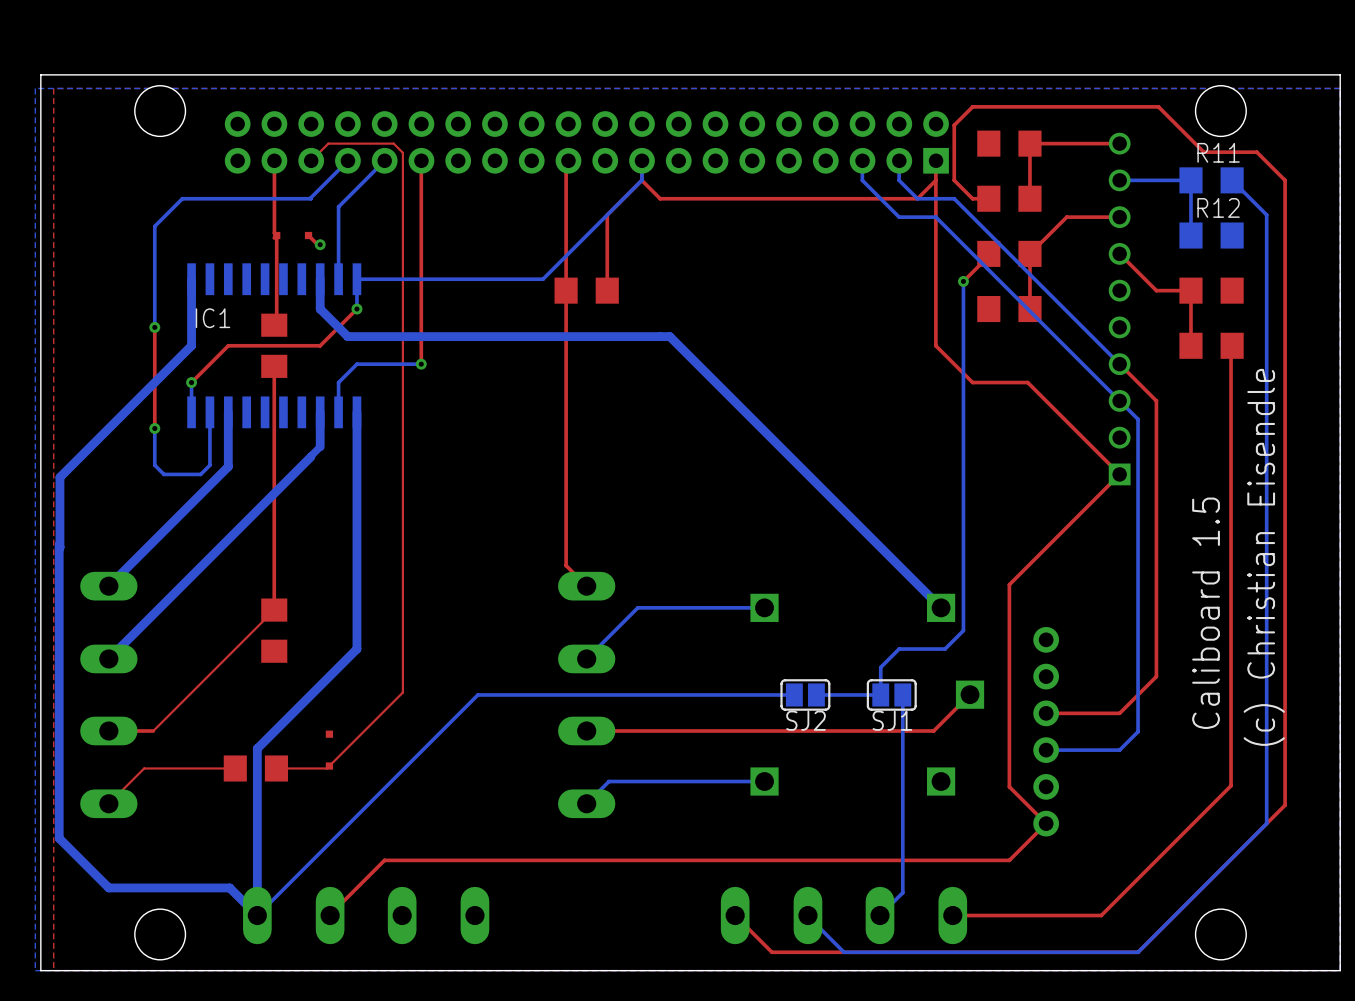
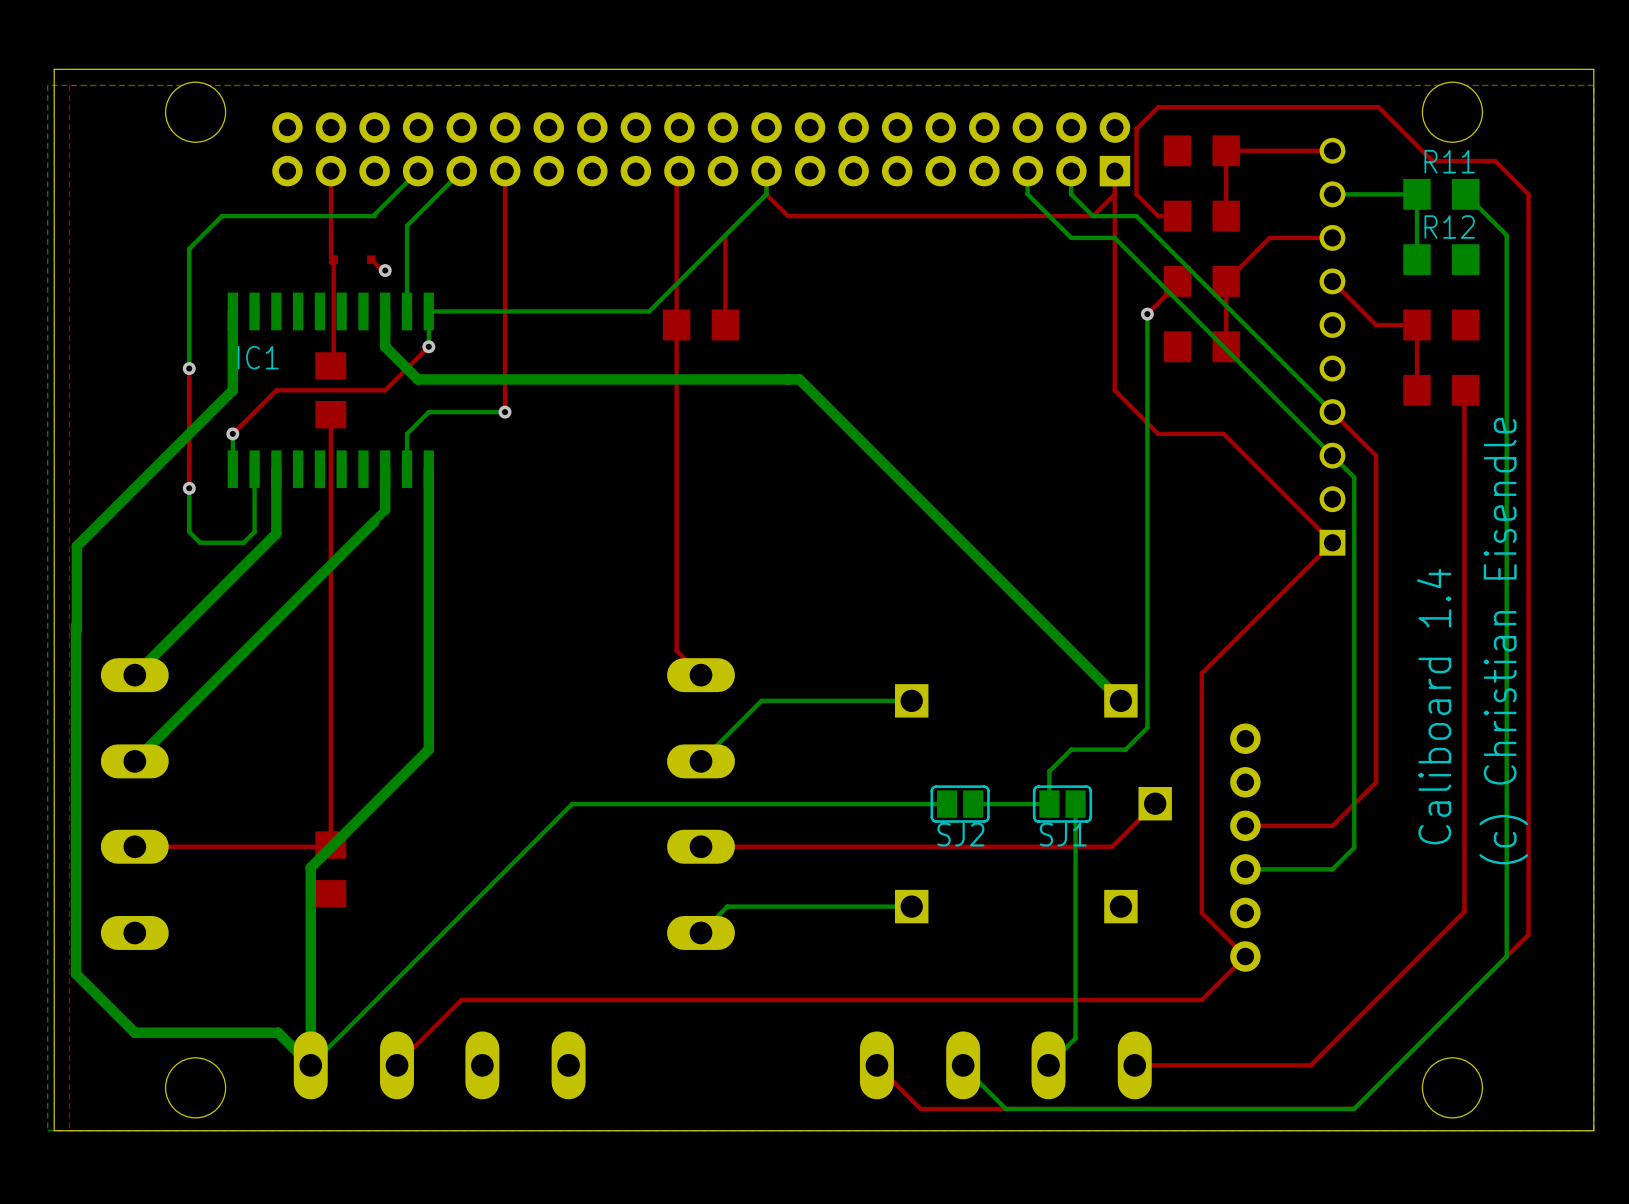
top track: (311, 160) (328, 143) (393, 143) (402, 152) (402, 692) (326, 768) (276, 768) -> none
top track: (274, 610) (153, 731) -> (330, 703) (330, 845) (329, 846) (187, 846)
text: Caliboard 1.5 (1206, 613) -> Caliboard 1.4 (1434, 706)
part: (274, 630) -> none
part: (329, 750) -> none
top track: (235, 768) (144, 768) (108, 803) -> none
part rotation: 0° (255, 768) -> 90° clockwise (330, 869)

